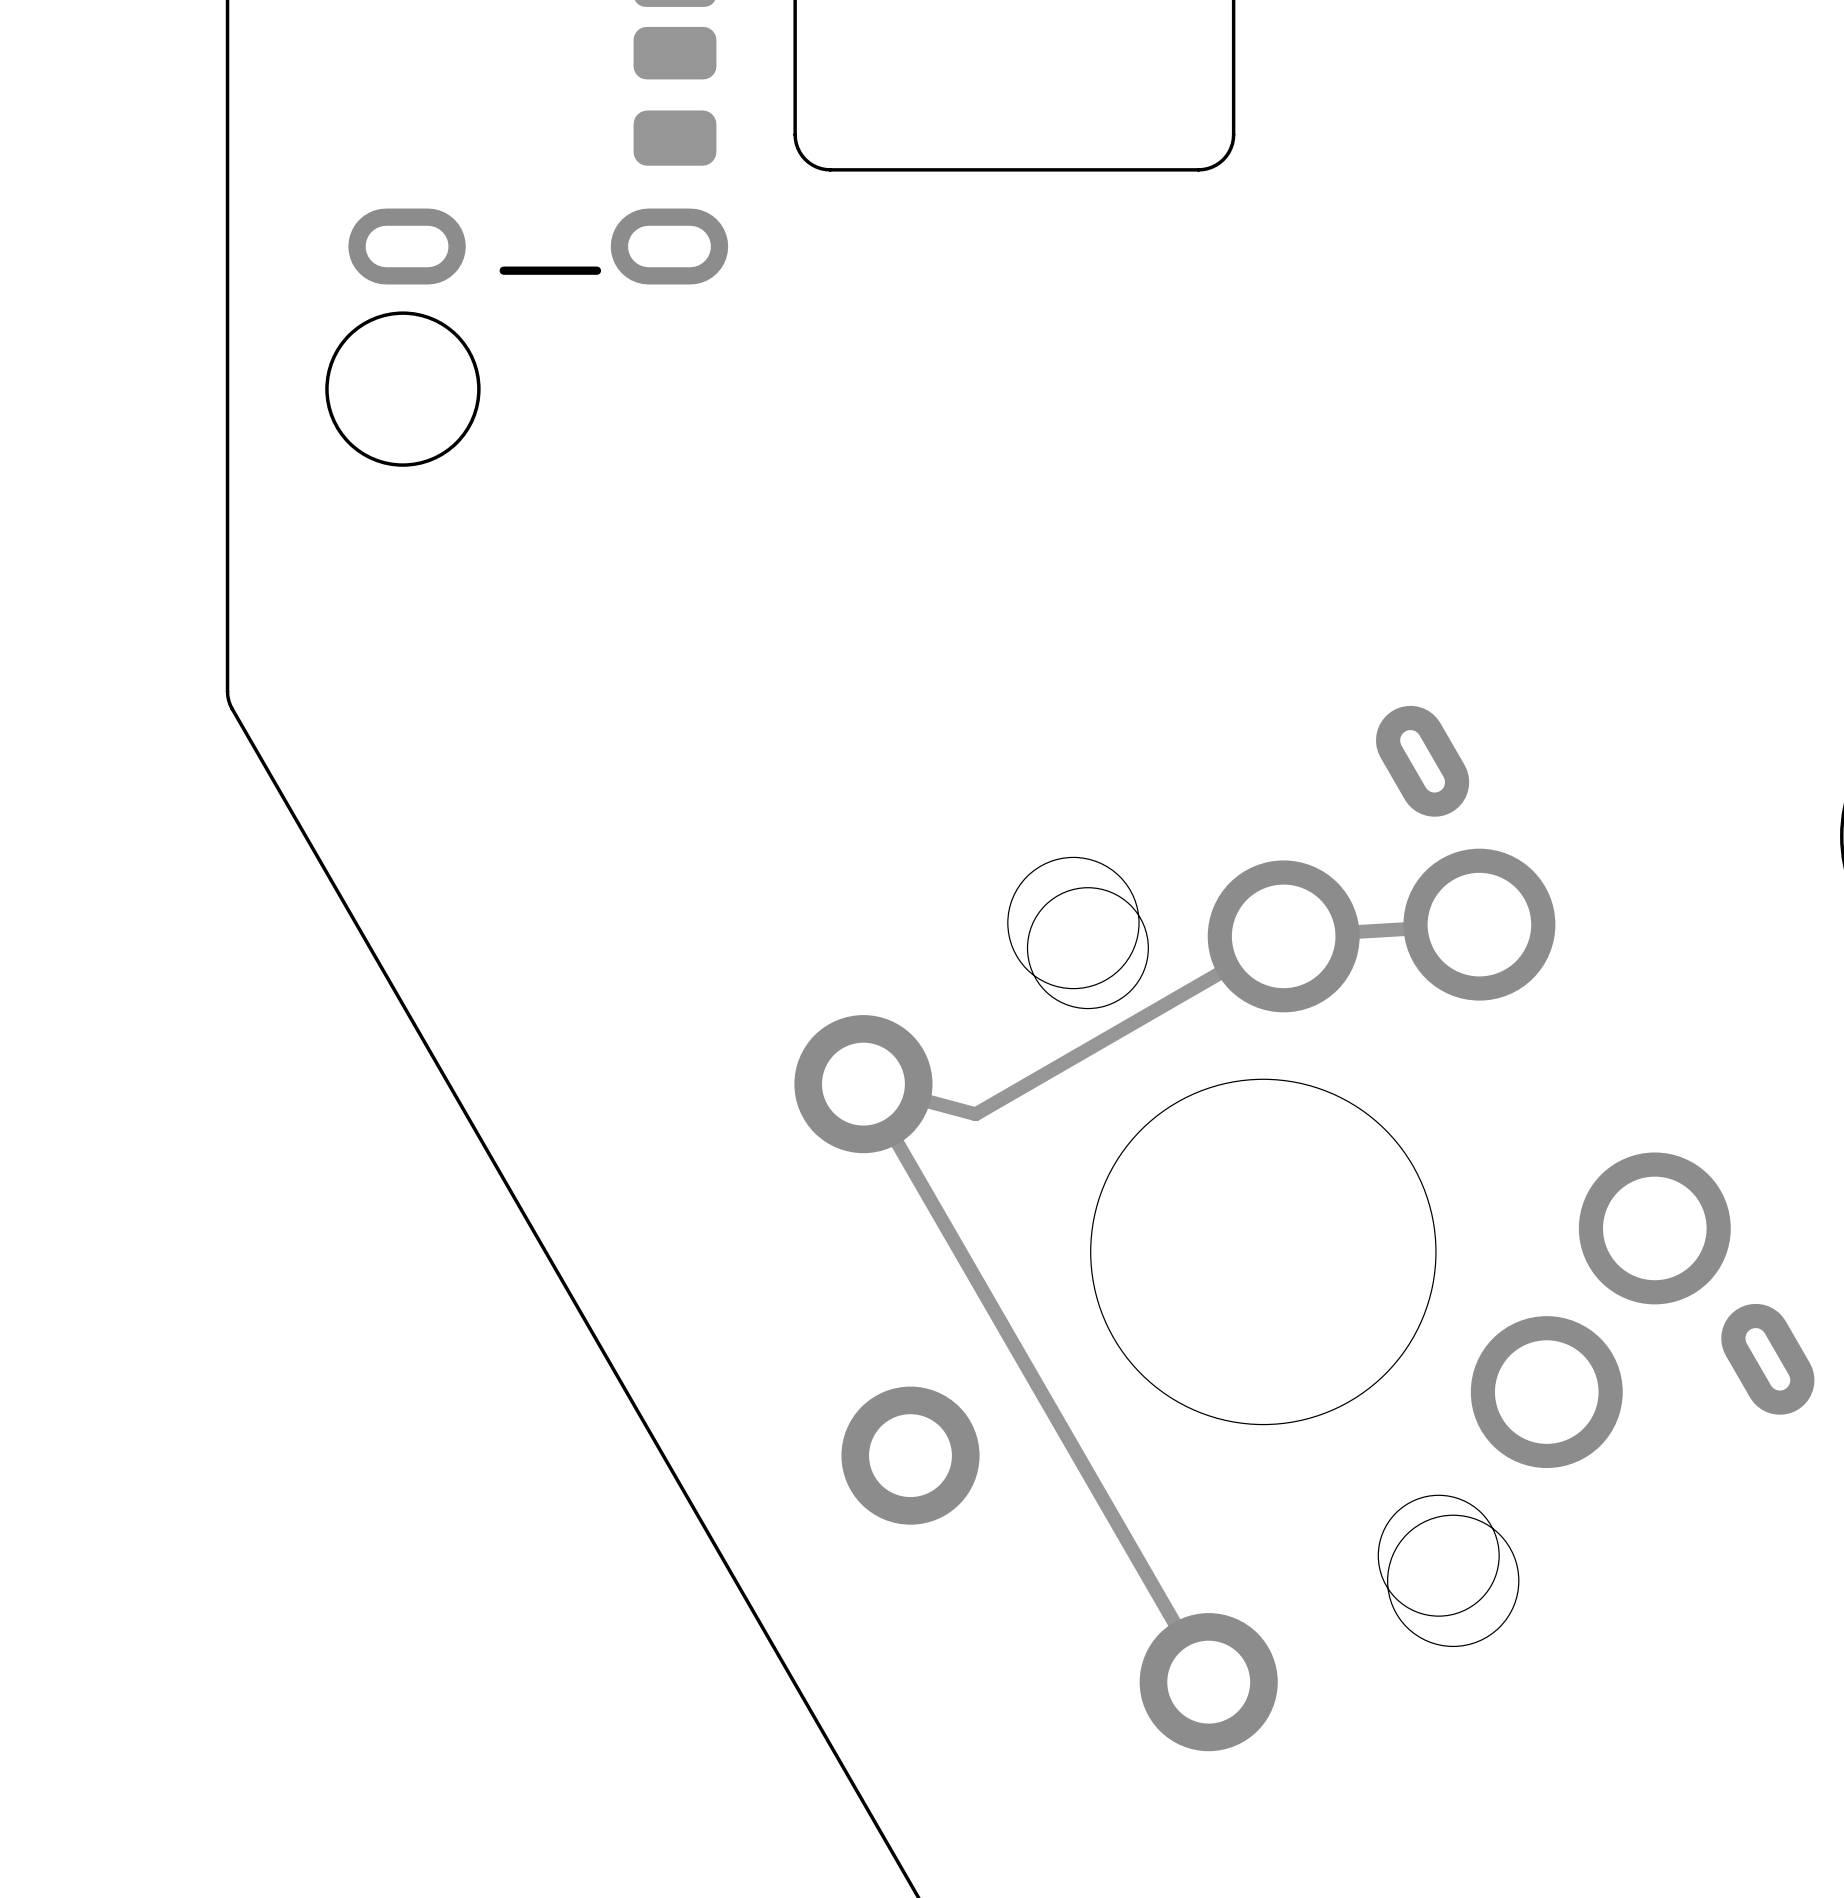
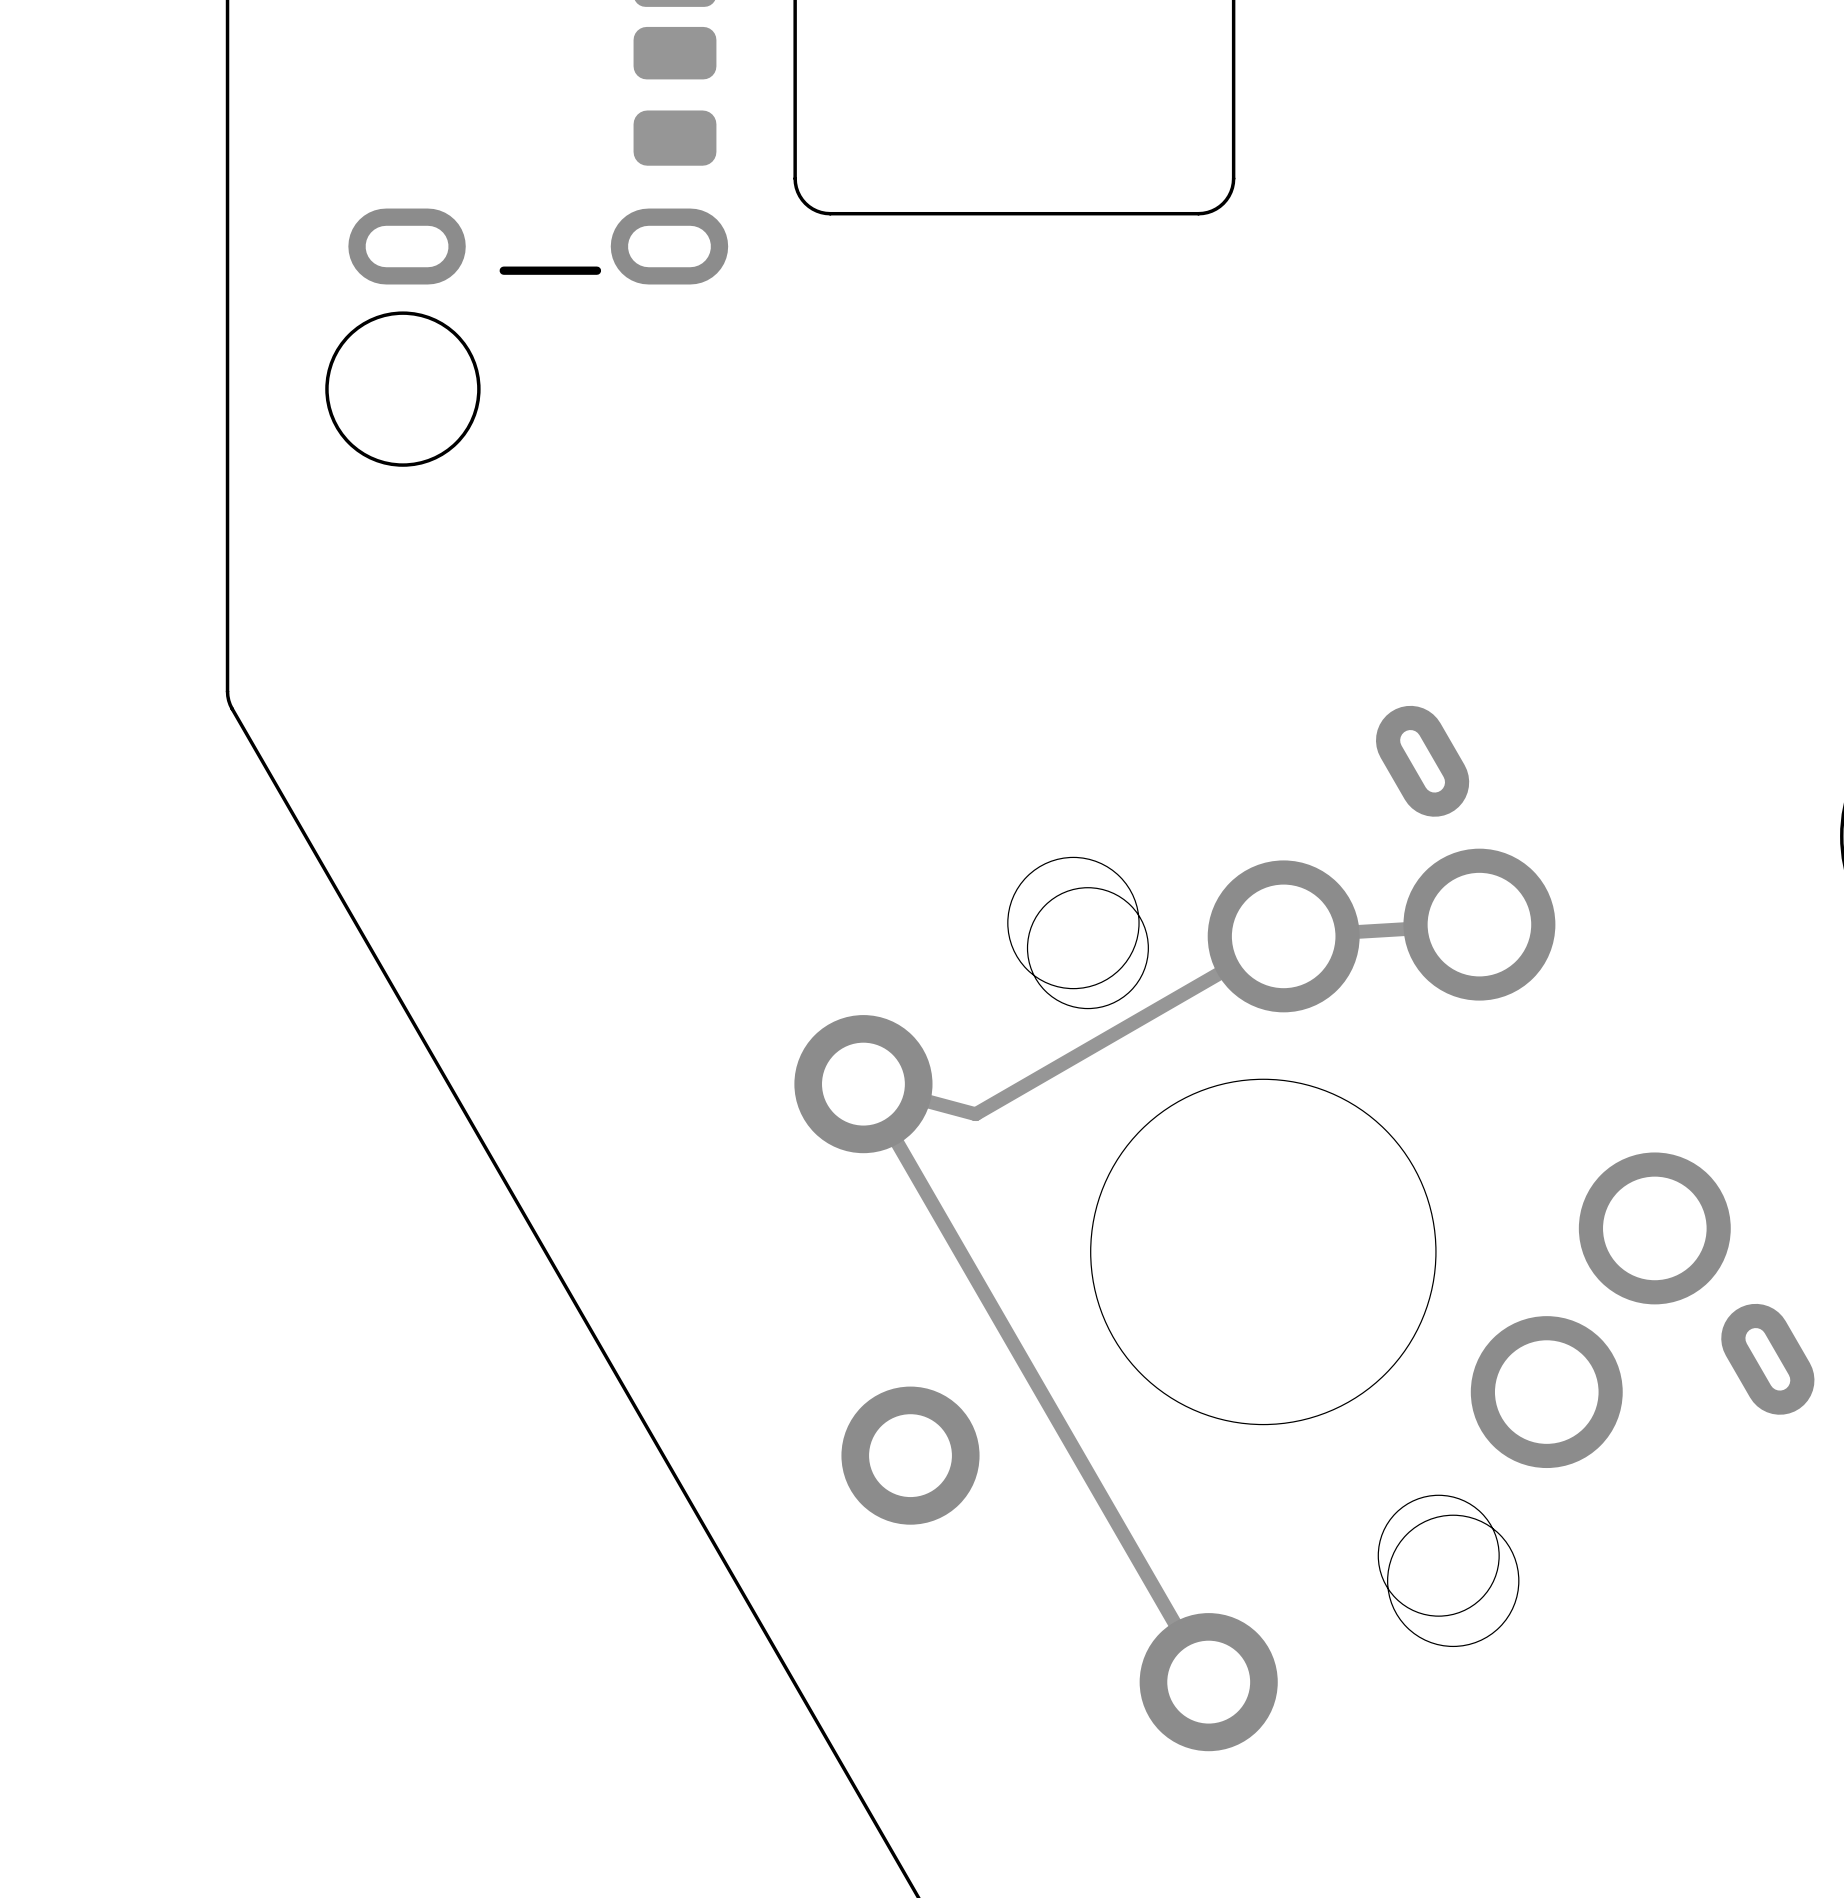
board edge: (1233, 134) (1230, 148) (1223, 159) (1211, 167) (1198, 169) (825, 169) (812, 165) (805, 159) (797, 148) (795, 134) -> (1233, 134) (1233, 178) (1230, 192) (1219, 206) (1207, 212) (1198, 213) (825, 213) (808, 206) (797, 192) (795, 178) (795, 134)

